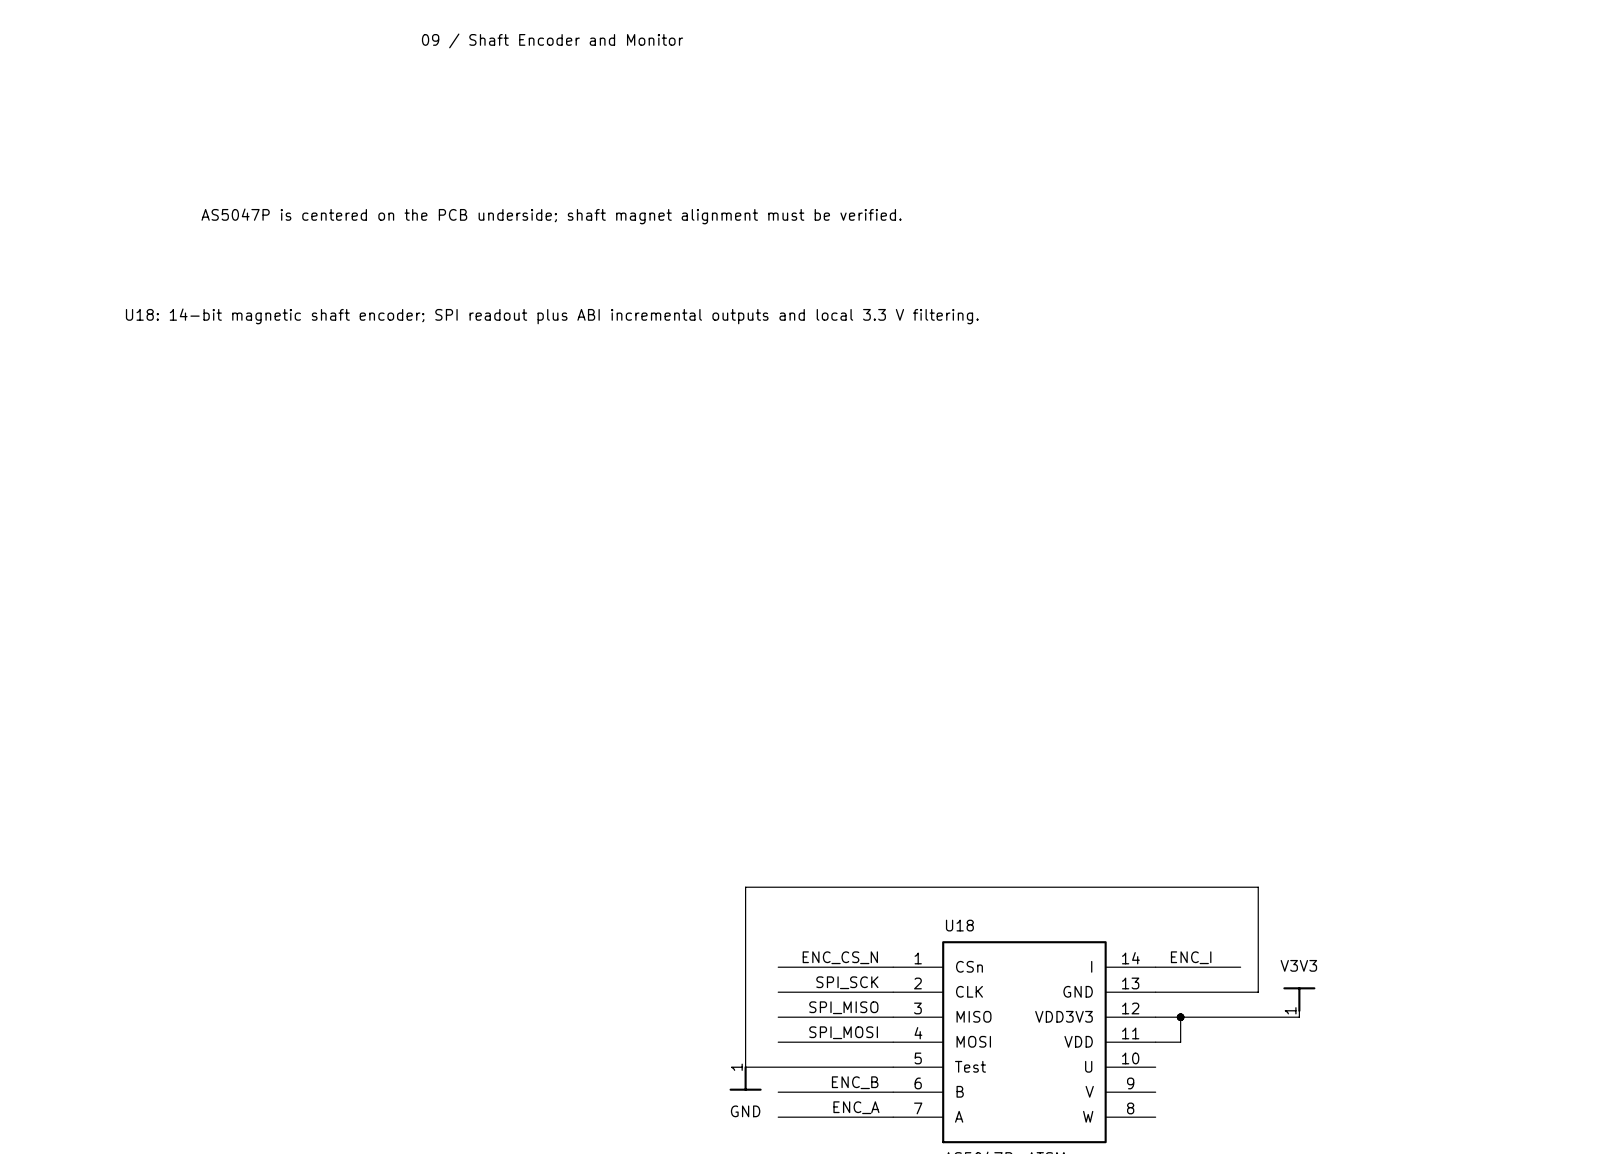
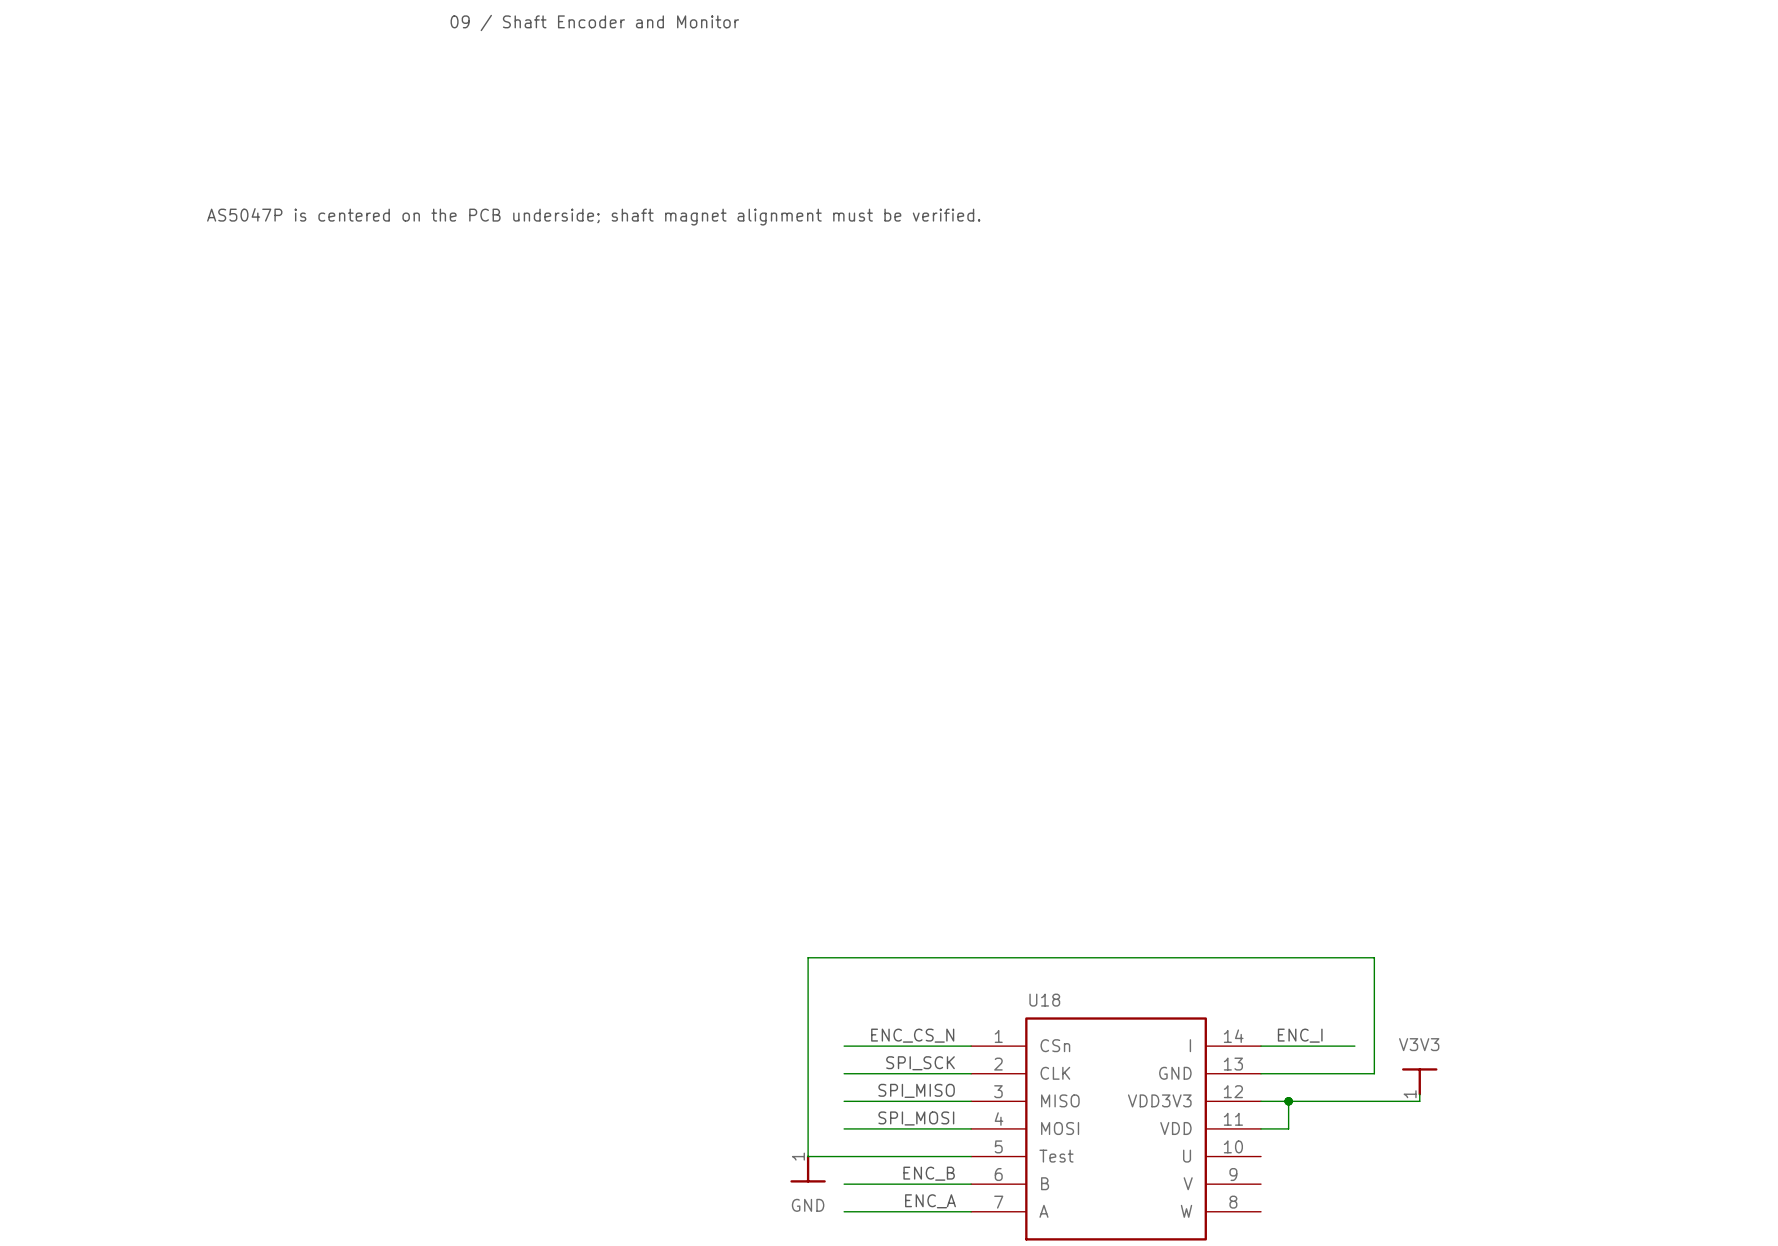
text: U18: 14-bit magnetic shaft encoder; SPI readout plus ABI incremental outputs and local 3.3 V filtering. (552, 316) -> none

